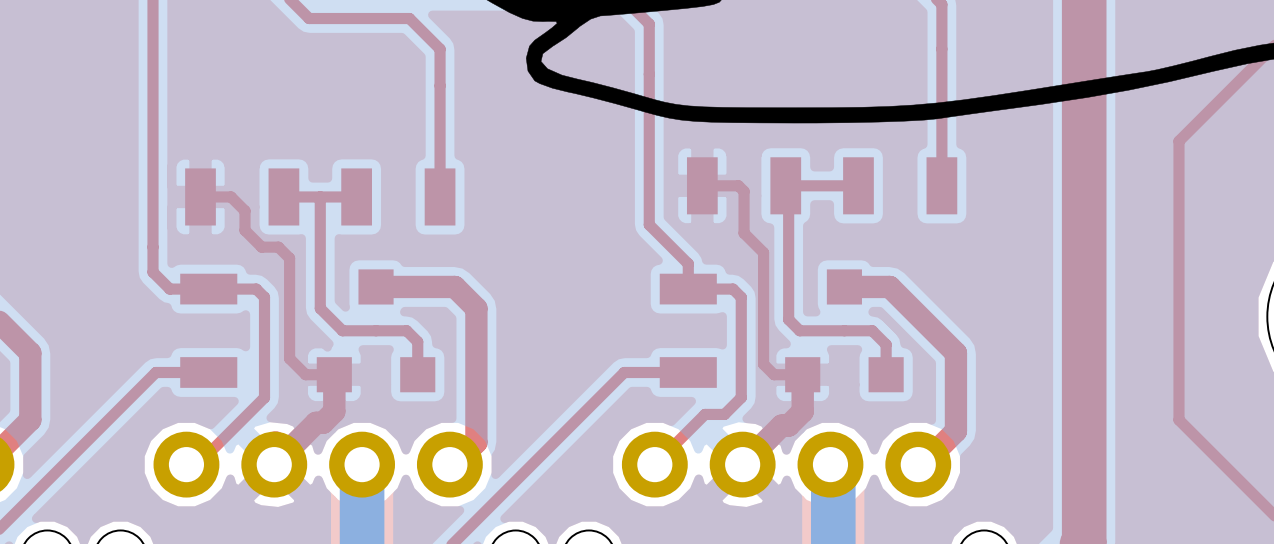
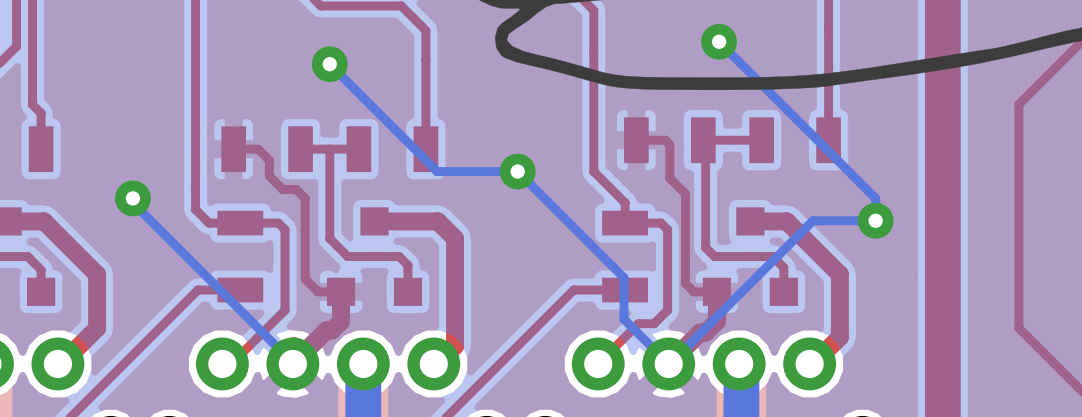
bottom track: none -> (719, 41) (875, 198) (875, 220) (813, 220) (669, 363) (623, 319) (623, 277) (517, 171) (437, 171) (329, 64)
via: none -> (719, 41)
via: none -> (329, 64)
via: none -> (517, 171)
bottom track: none -> (132, 198) (132, 202) (292, 363)
via: none -> (132, 198)
via: none -> (875, 220)

